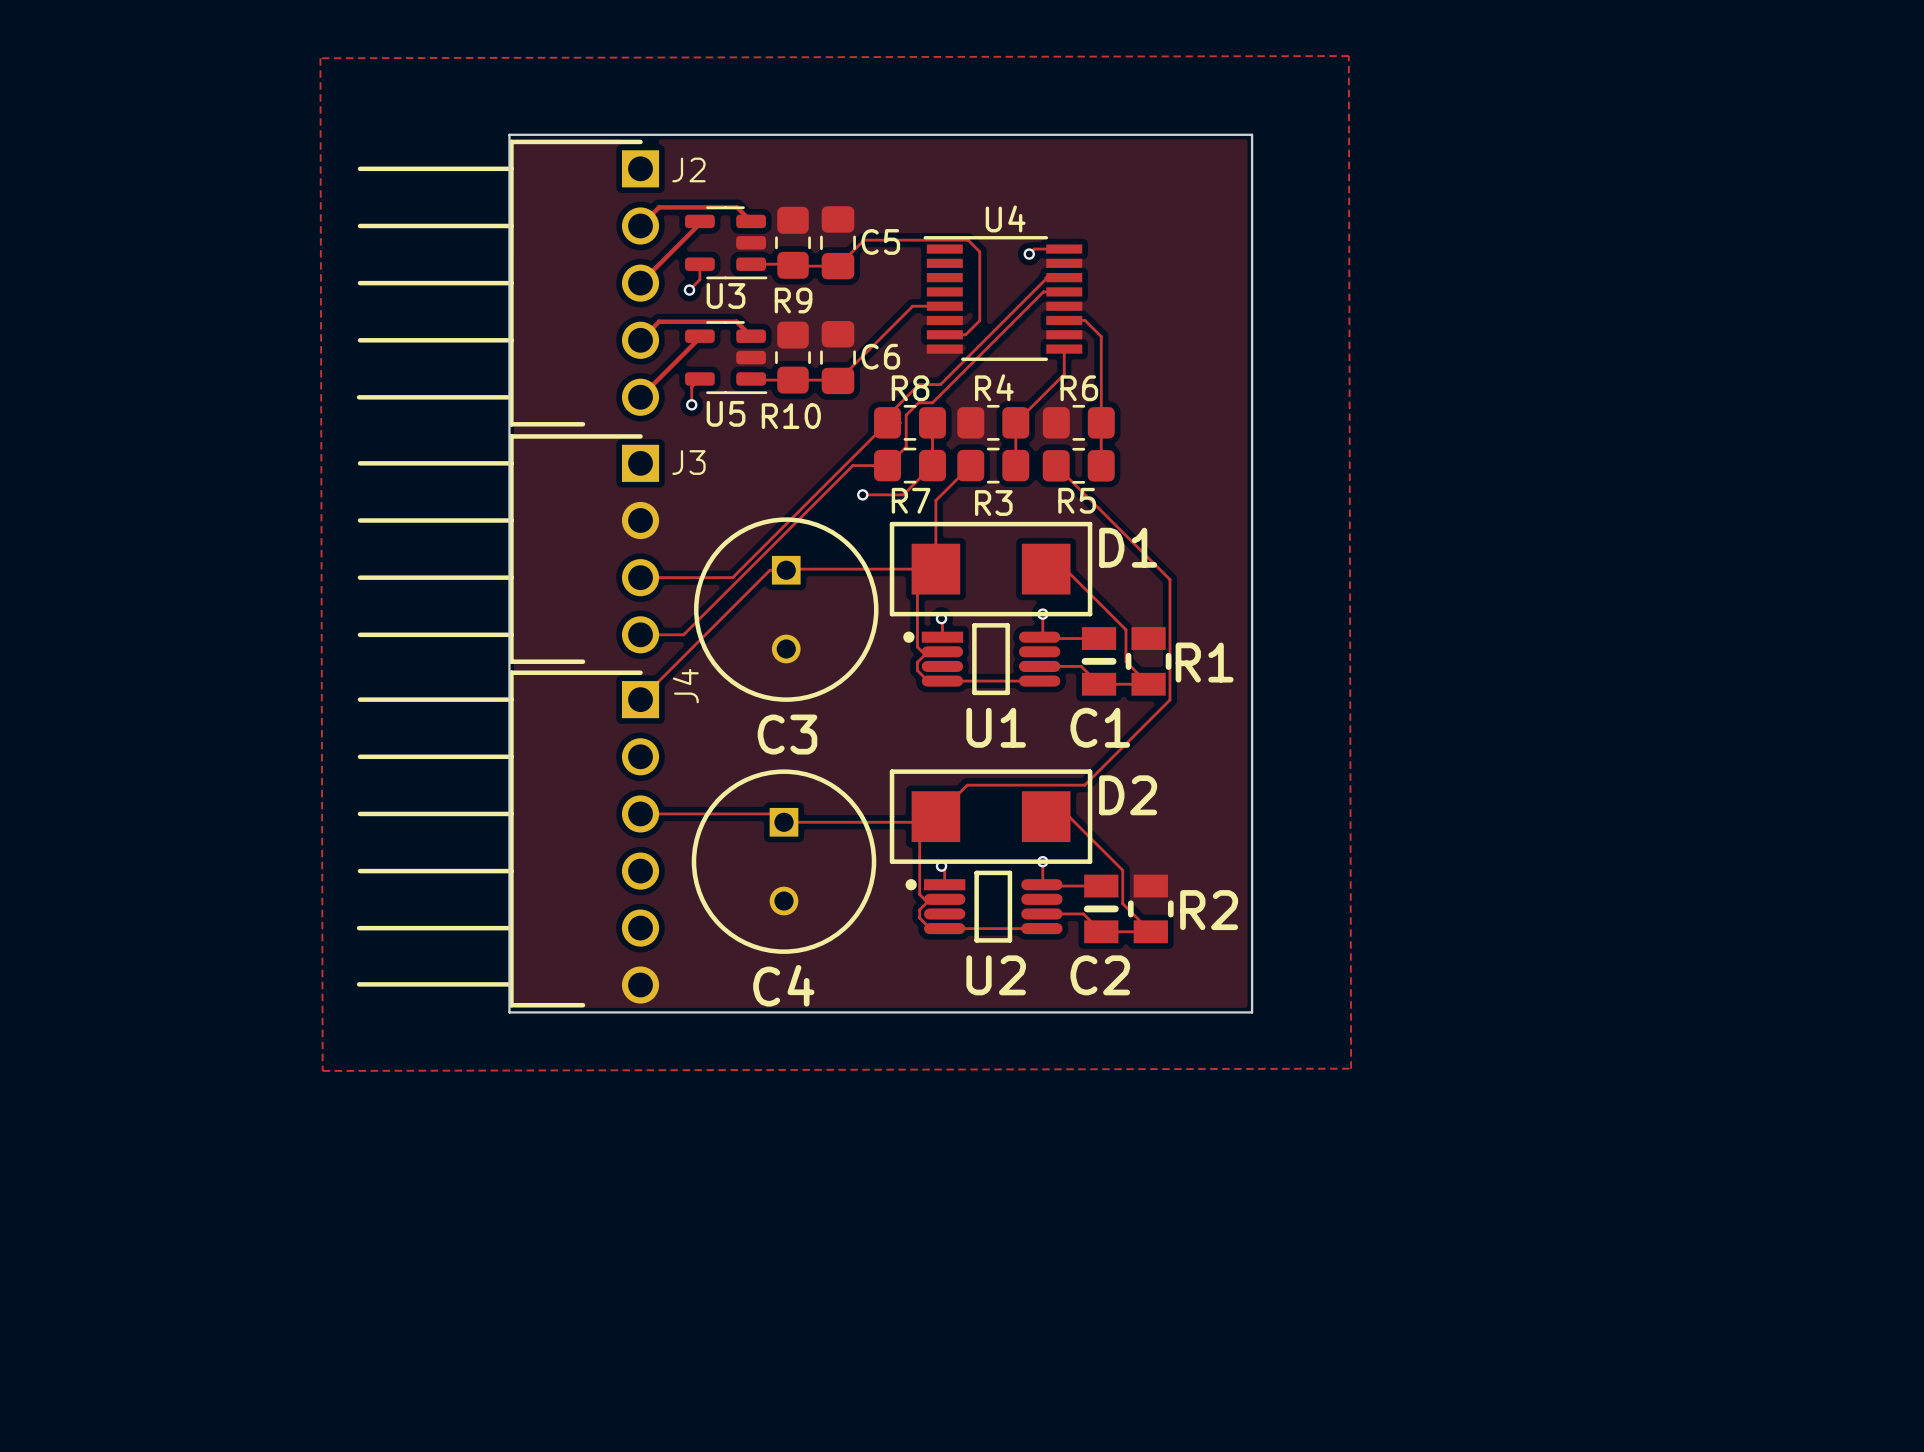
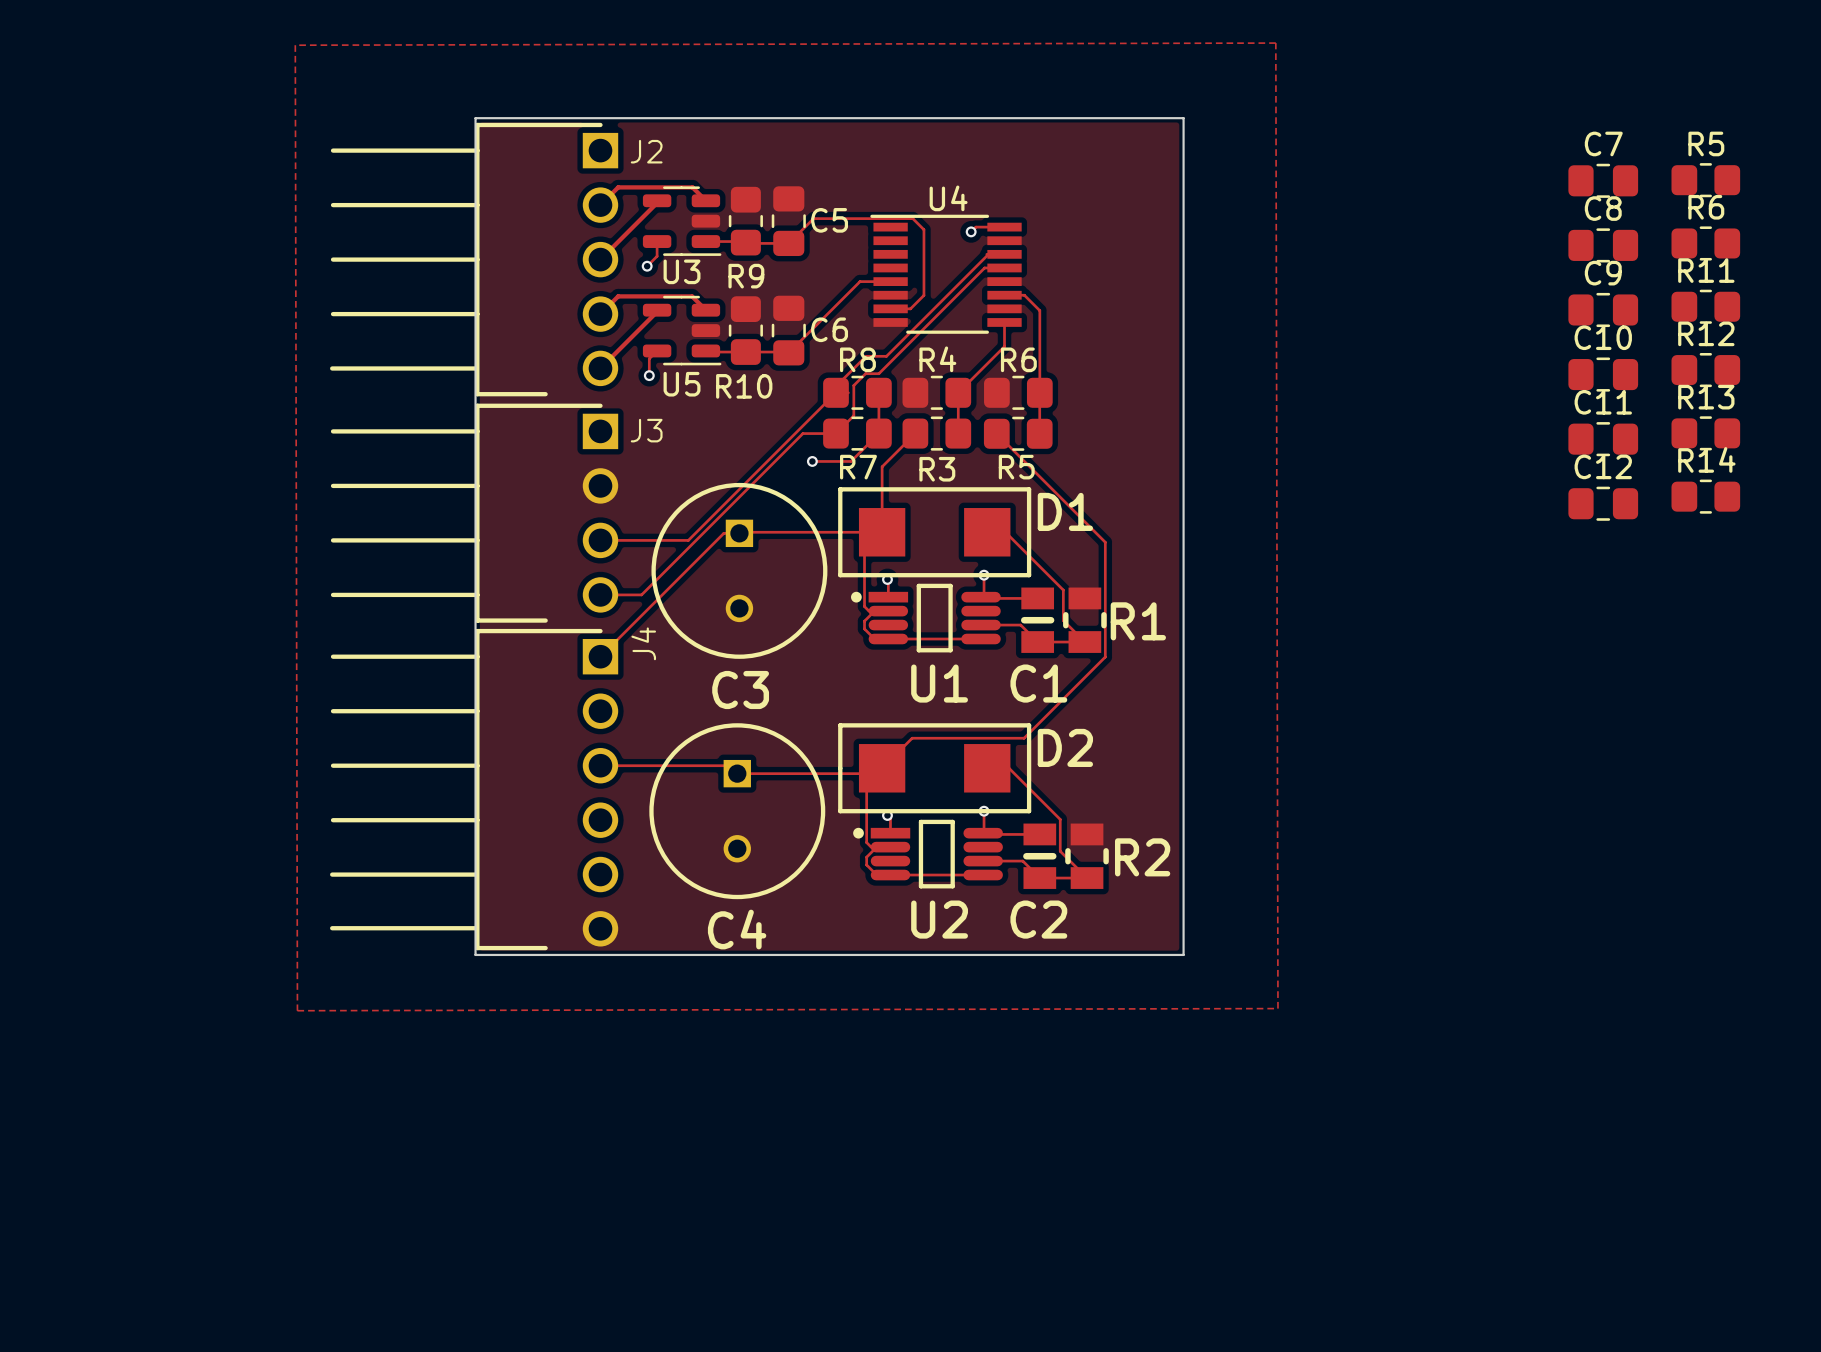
R5: none -> (1705, 180)
C7: none -> (1603, 180)
R6: none -> (1705, 243)
C8: none -> (1603, 245)
R11: none -> (1705, 306)
C9: none -> (1603, 309)
R12: none -> (1705, 370)
C10: none -> (1603, 374)
R13: none -> (1705, 433)
C11: none -> (1603, 439)
R14: none -> (1705, 496)
C12: none -> (1603, 503)

